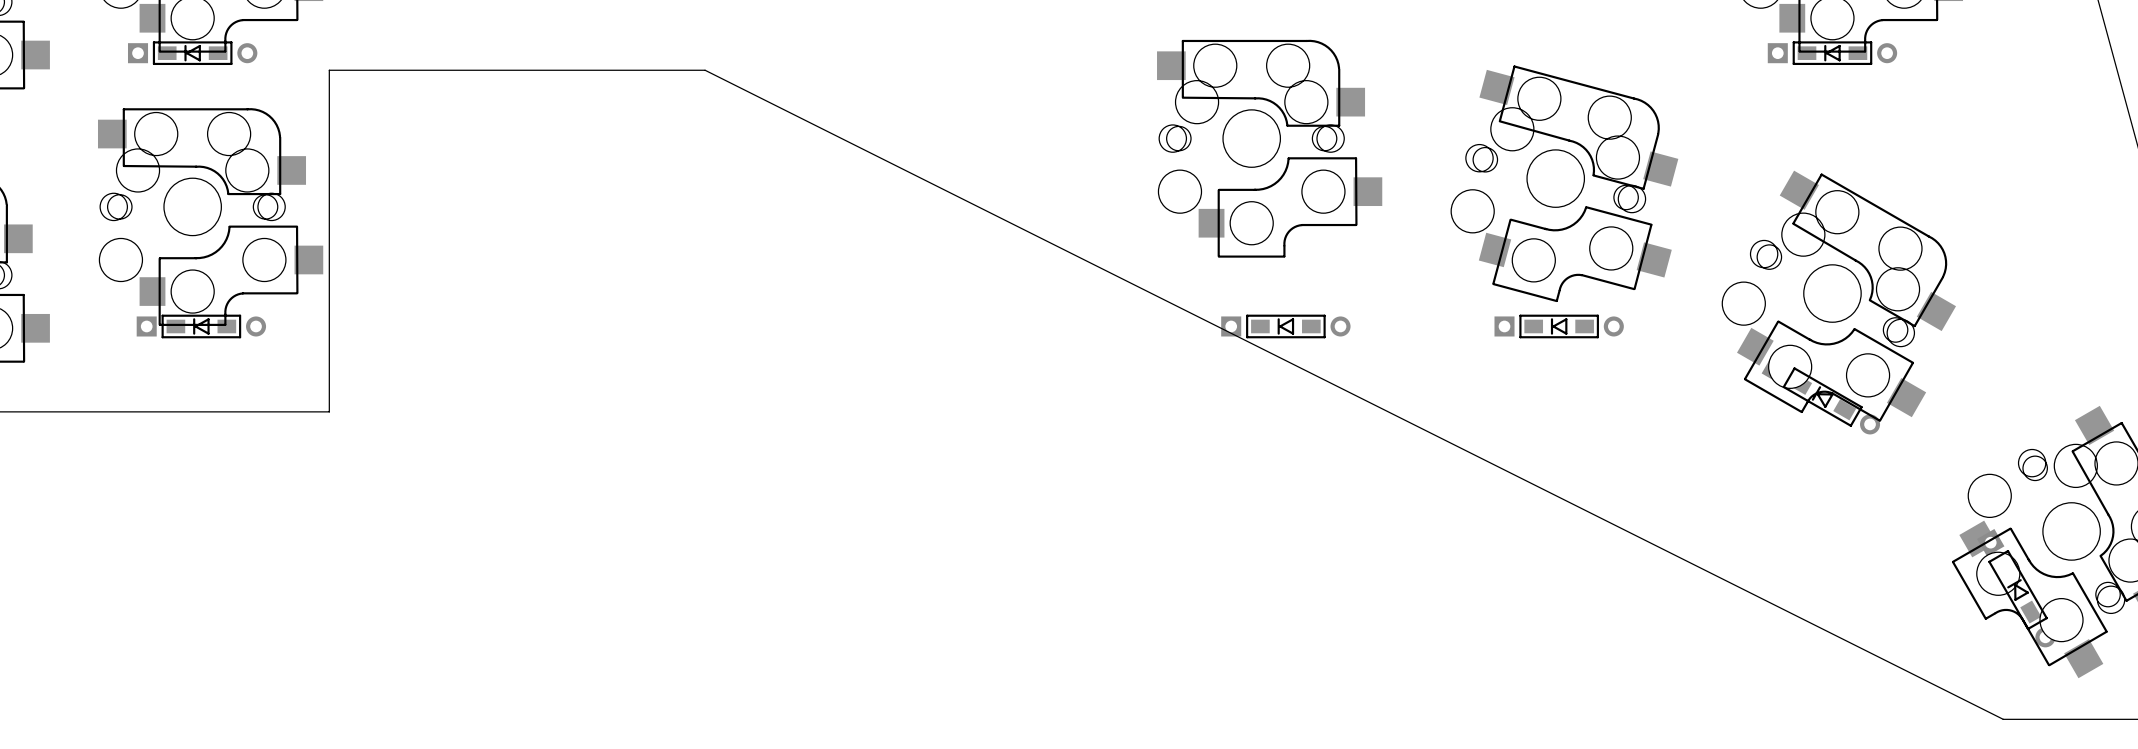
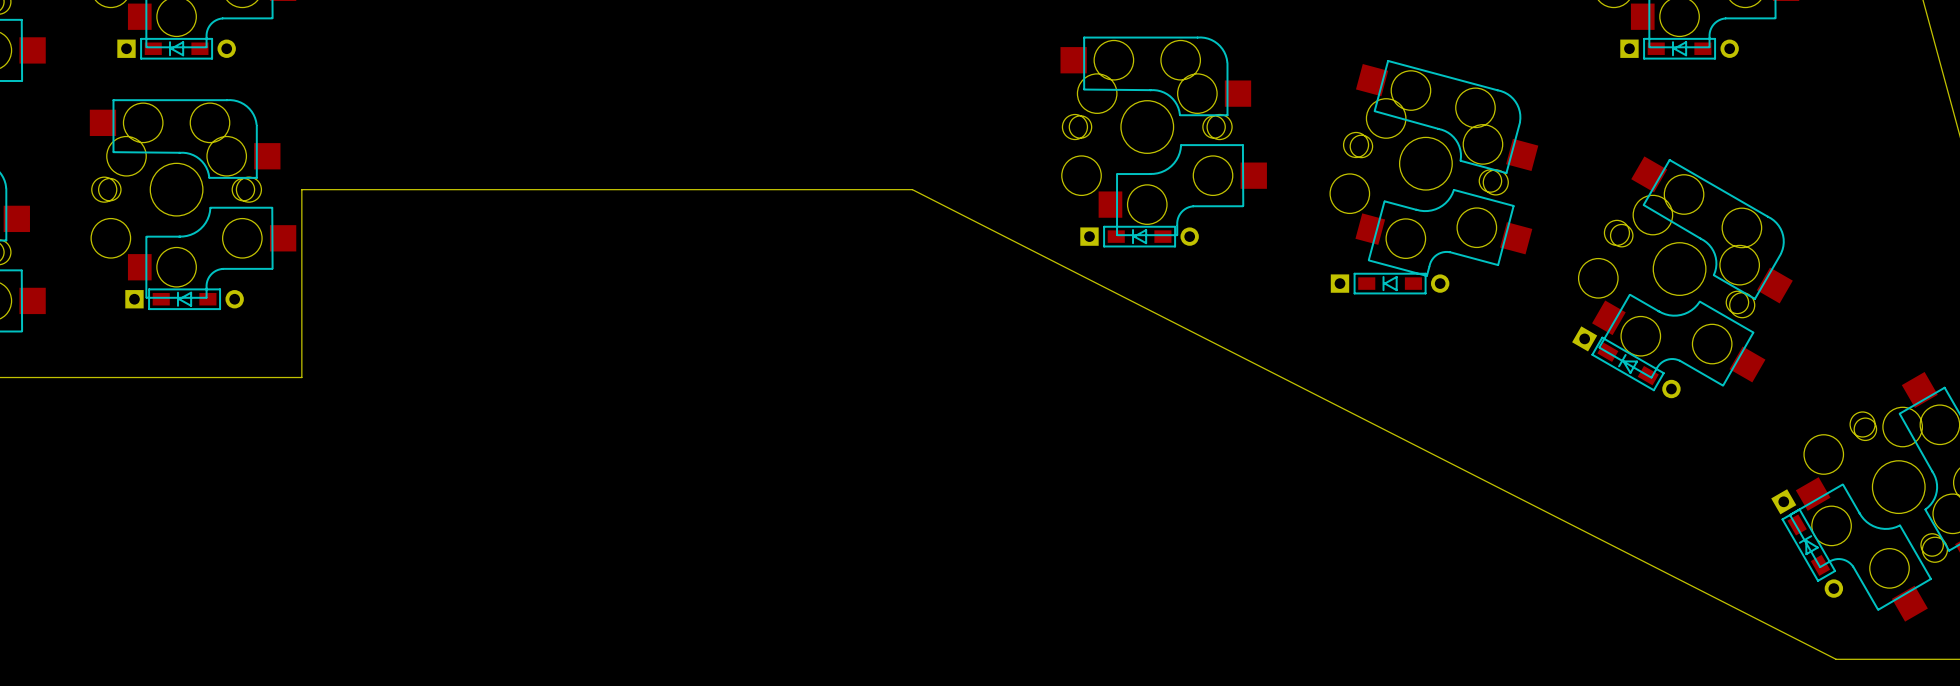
board edge: (329, 206) (329, 70) (705, 70) (2003, 719) -> (301, 189) (912, 189) (1836, 659)
part position: (1285, 326) -> (1139, 236)
part position: (1559, 326) -> (1390, 283)
part position: (1820, 395) -> (1626, 362)
part position: (2016, 588) -> (1807, 543)

